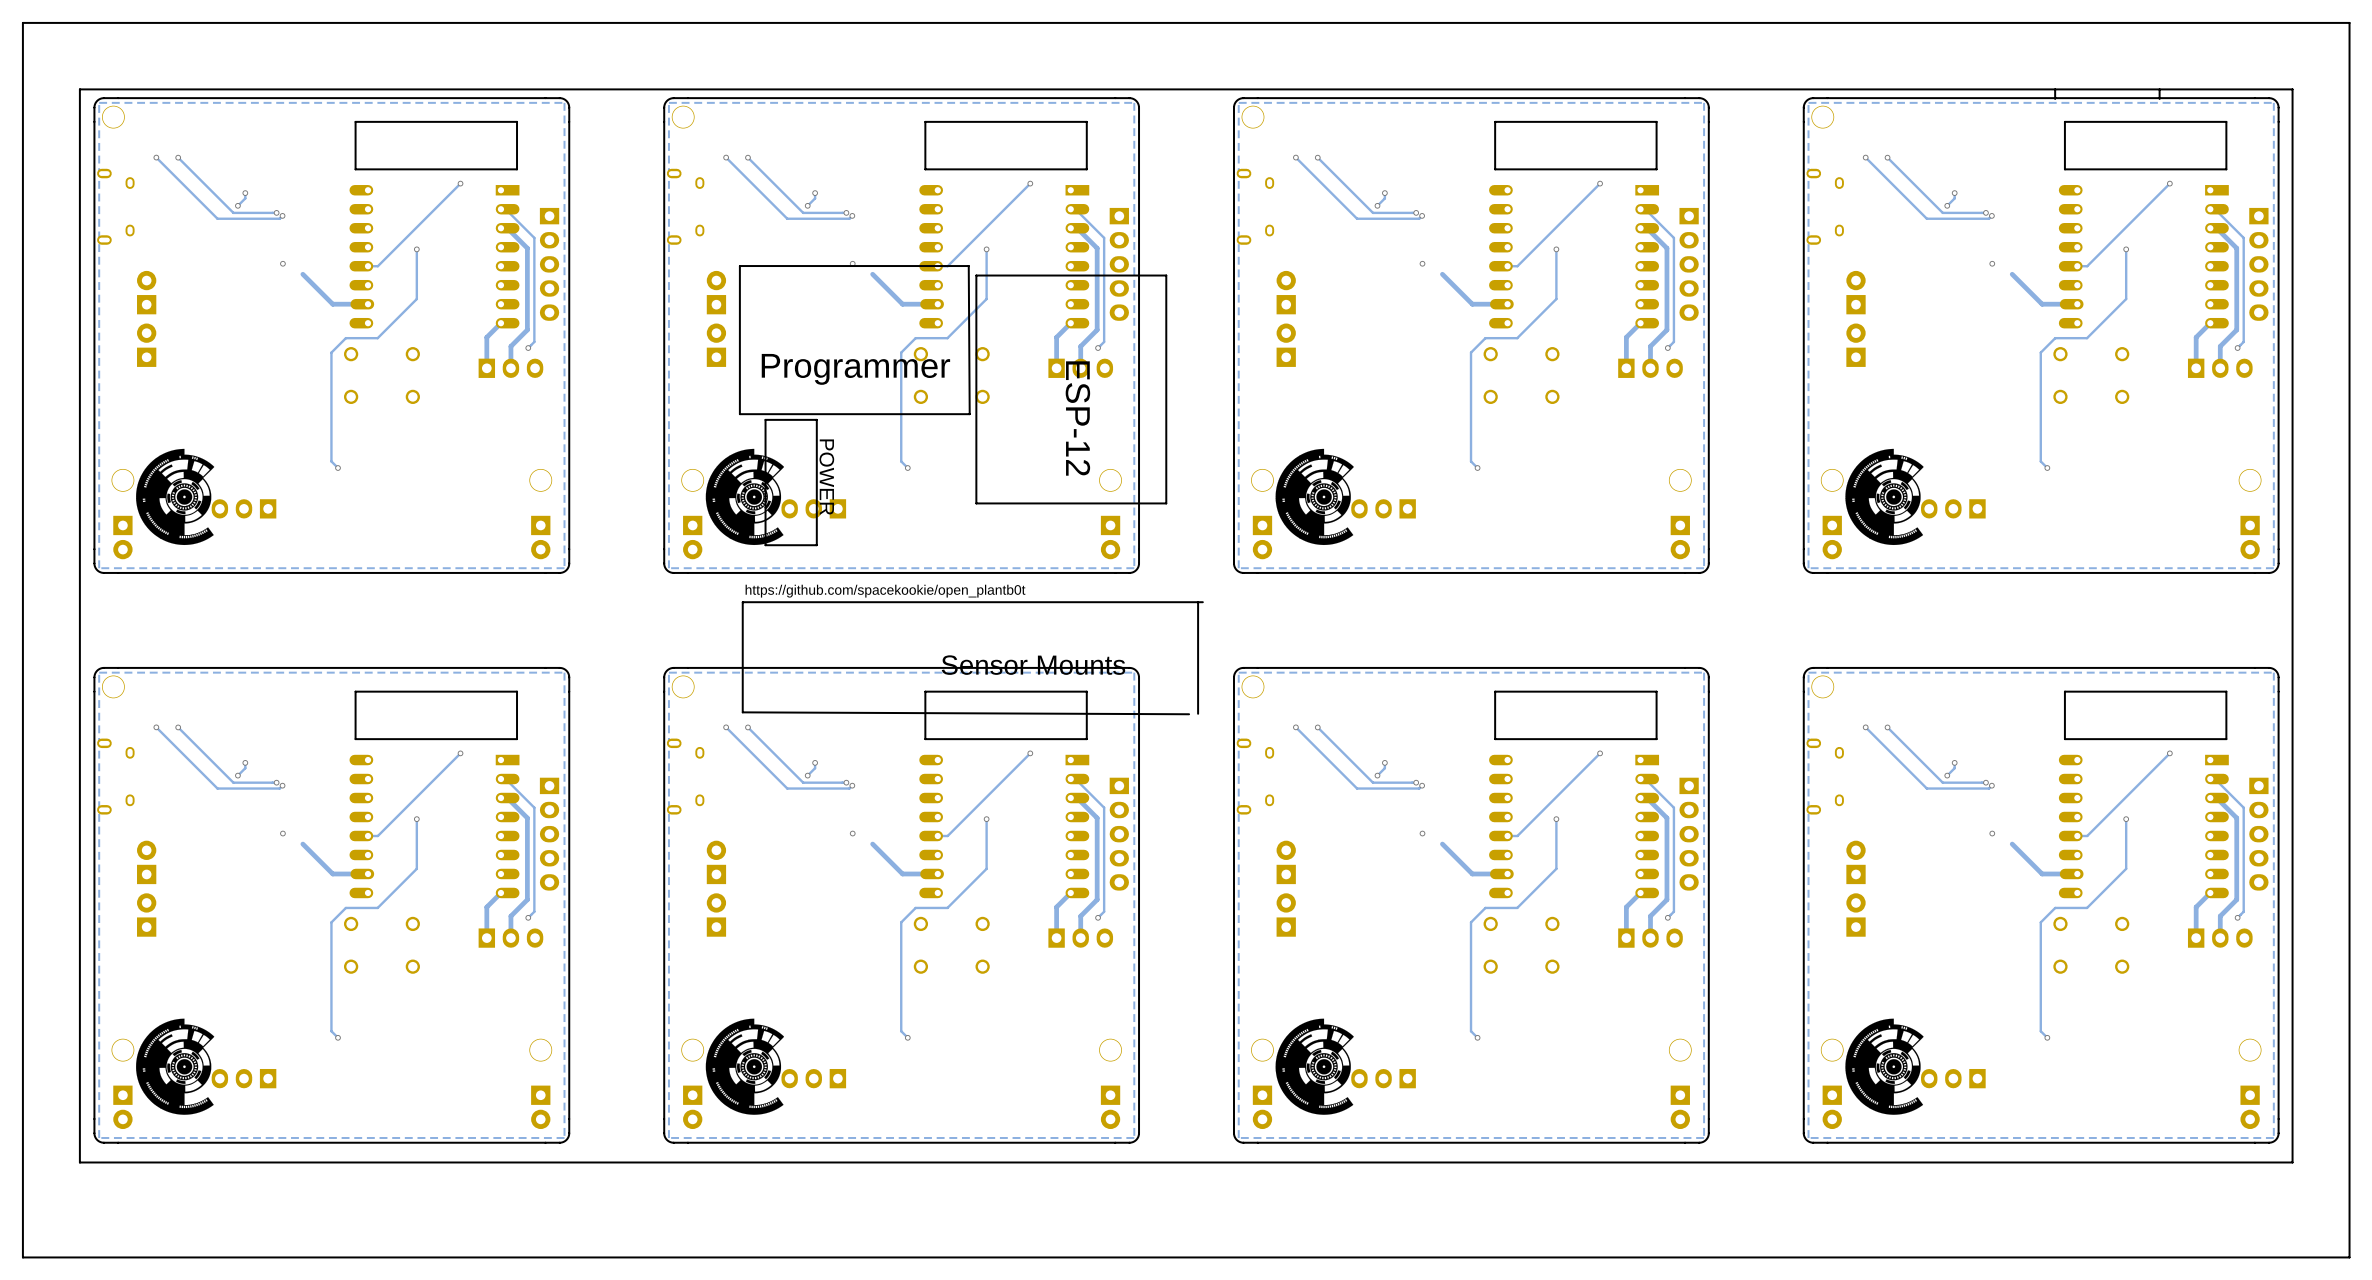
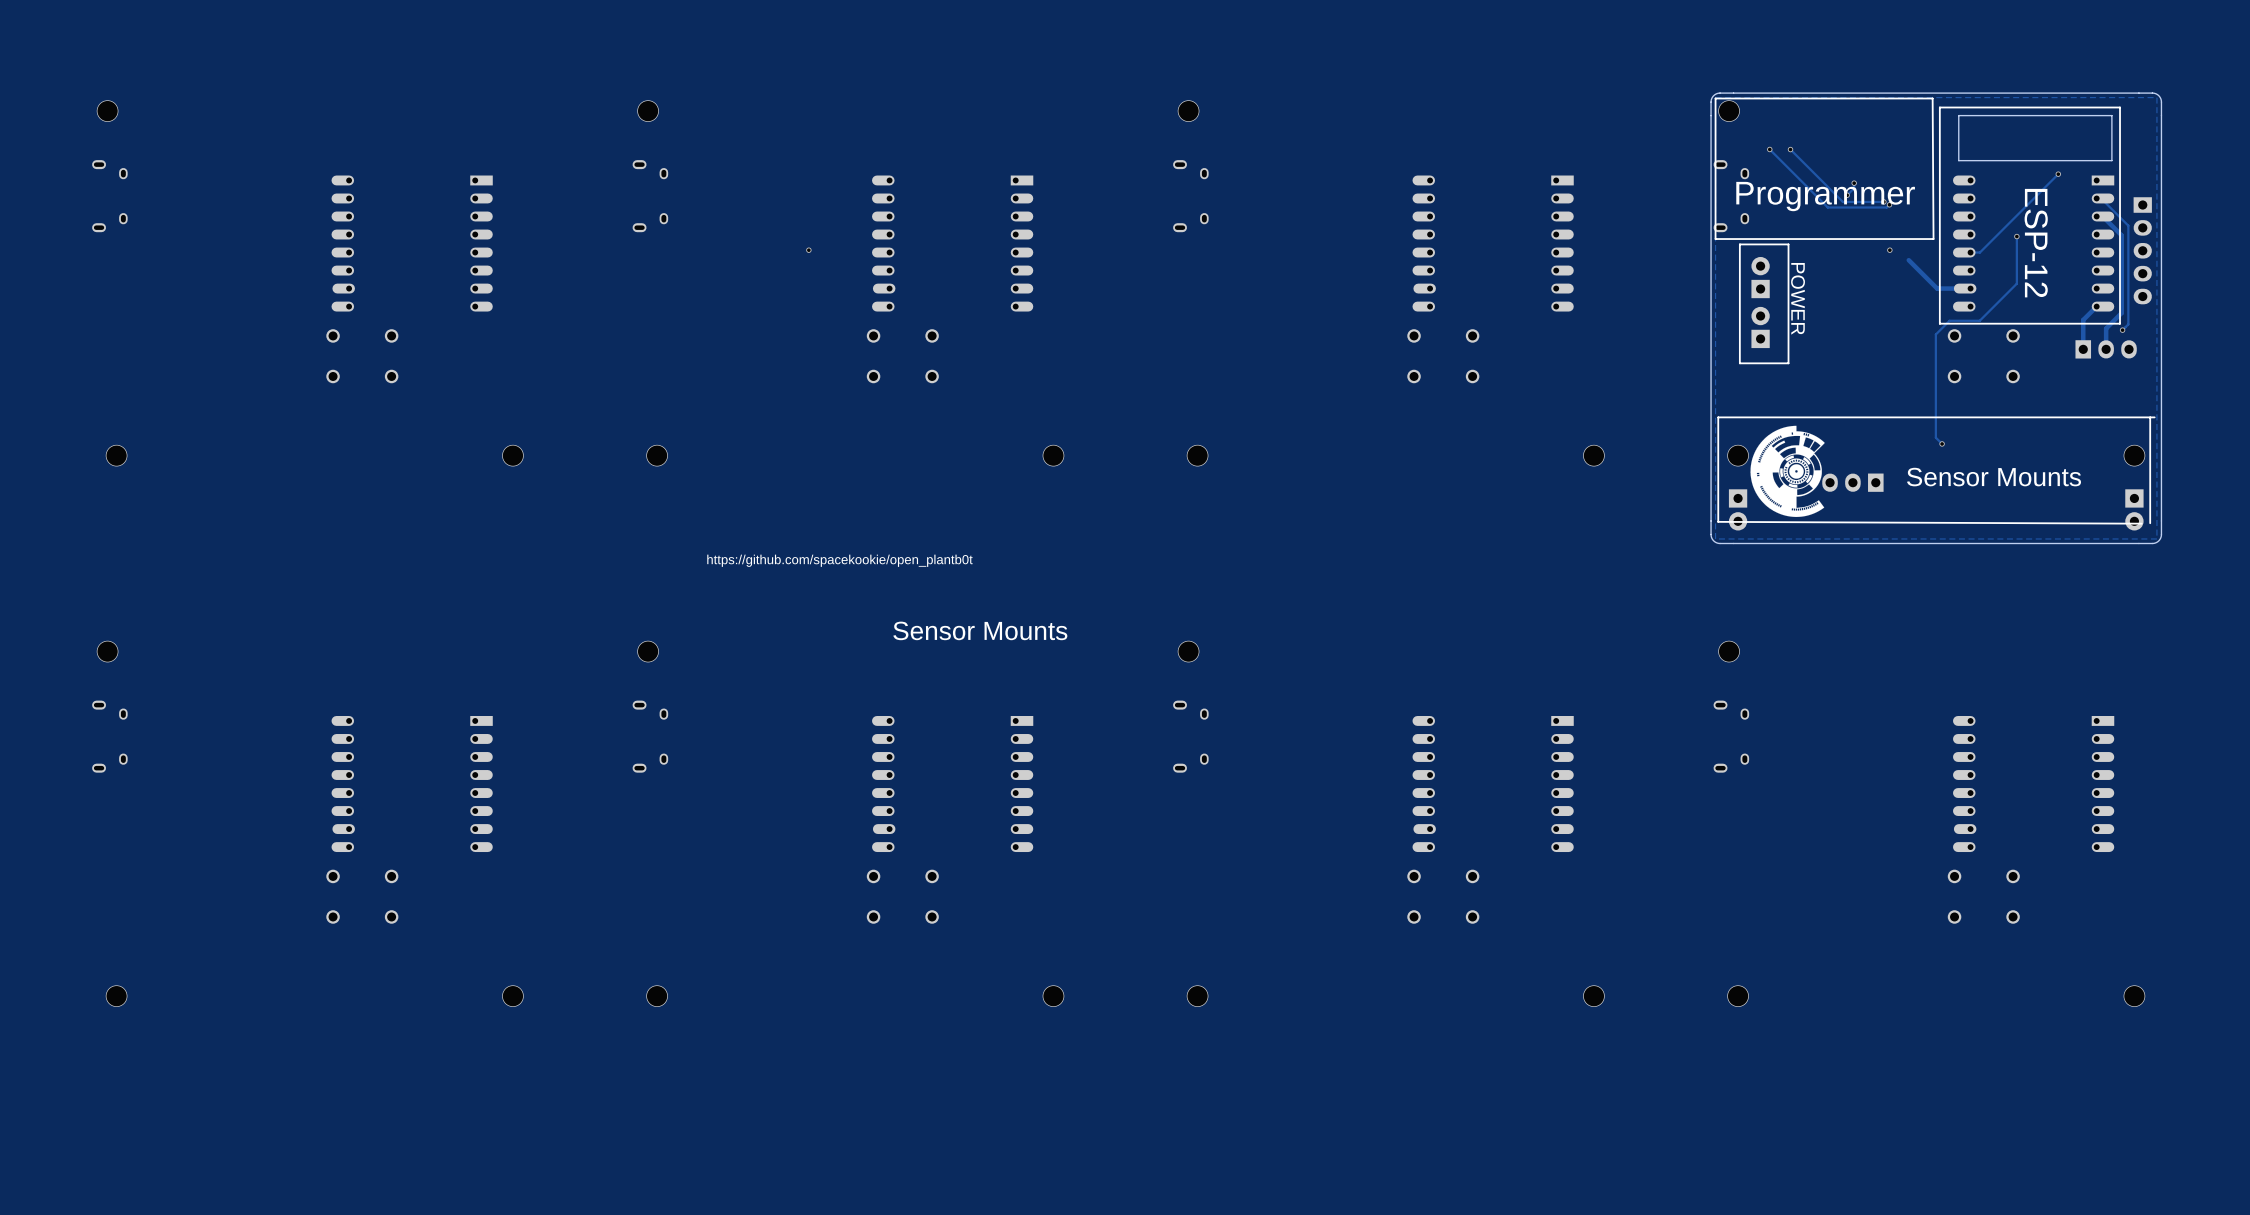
board edge: (2349, 22) (2349, 1257) (22, 1257) (22, 22) (2349, 22) -> none
board edge: (2055, 89) (2055, 98) -> none
board edge: (2159, 89) (2159, 98) -> none
board edge: (2292, 89) (79, 89) (79, 1162) (2292, 1162) (2292, 89) -> none
board edge: (559, 98) (103, 98) (97, 100) (94, 107) (94, 563) (97, 570) (103, 572) (559, 572) (566, 570) (569, 563) (569, 107) (566, 100) (559, 98) -> none
board edge: (1129, 98) (673, 98) (666, 100) (664, 107) (664, 563) (666, 570) (673, 572) (1129, 572) (1136, 570) (1139, 563) (1139, 107) (1136, 100) (1129, 98) -> none
board edge: (1699, 98) (1243, 98) (1236, 100) (1233, 107) (1233, 563) (1236, 570) (1243, 572) (1699, 572) (1706, 570) (1708, 563) (1708, 107) (1706, 100) (1699, 98) -> none
zone outline: (564, 102) (99, 102) (99, 568) (564, 568) (564, 102) -> none
zone outline: (1134, 102) (668, 102) (668, 568) (1134, 568) (1134, 102) -> none
zone outline: (1704, 102) (1238, 102) (1238, 568) (1704, 568) (1704, 102) -> none
line: none -> (1932, 98) (1715, 98) (1715, 239) (1933, 239) (1932, 98)
line: none -> (2120, 107) (2120, 323) (1939, 323) (1939, 107) (2120, 107)
board edge: (517, 121) (517, 169) (355, 169) (355, 121) (517, 121) -> none
board edge: (1086, 121) (1086, 169) (925, 169) (925, 121) (1086, 121) -> none
board edge: (1656, 121) (1656, 169) (1495, 169) (1495, 121) (1656, 121) -> none
track: (156, 157) (217, 218) (279, 218) (282, 215) -> none
via: (156, 157) -> none
track: (178, 157) (233, 212) (276, 212) -> none
via: (178, 157) -> none
track: (726, 157) (787, 218) (849, 218) (852, 215) -> none
via: (726, 157) -> none
track: (747, 157) (803, 212) (846, 212) -> none
via: (747, 157) -> none
track: (1295, 157) (1357, 218) (1419, 218) (1422, 215) -> none
via: (1295, 157) -> none
track: (1317, 157) (1372, 212) (1416, 212) -> none
via: (1317, 157) -> none
track: (460, 183) (377, 266) (368, 266) -> none
via: (460, 183) -> none
track: (1030, 183) (947, 266) (937, 266) -> none
via: (1030, 183) -> none
track: (1600, 183) (1517, 266) (1507, 266) -> none
via: (1600, 183) -> none
track: (245, 193) (245, 198) (237, 205) -> none
via: (245, 193) -> none
track: (815, 193) (815, 198) (807, 205) -> none
via: (815, 193) -> none
track: (1384, 193) (1384, 198) (1377, 205) -> none
via: (1384, 193) -> none
via: (237, 205) -> none
via: (807, 205) -> none
via: (1377, 205) -> none
text: none -> Programmer (1825, 196)
track: (505, 209) (534, 237) (534, 341) (528, 348) -> none
track: (1075, 209) (1104, 237) (1104, 341) (1098, 348) -> none
track: (1645, 209) (1673, 237) (1673, 341) (1667, 348) -> none
via: (276, 212) -> none
via: (846, 212) -> none
via: (1416, 212) -> none
via: (282, 215) -> none
via: (852, 215) -> none
via: (1422, 215) -> none
track: (500, 228) (507, 228) (527, 248) (527, 329) (510, 346) (510, 368) -> none
track: (1070, 228) (1077, 228) (1097, 248) (1097, 329) (1080, 346) (1080, 368) -> none
track: (1640, 228) (1646, 228) (1666, 248) (1666, 329) (1650, 346) (1650, 368) -> none
track: (416, 249) (416, 299) (377, 338) (345, 338) (331, 352) (331, 461) (338, 468) -> none
via: (416, 249) -> none
track: (986, 249) (986, 299) (947, 338) (915, 338) (901, 352) (901, 461) (907, 468) -> none
via: (986, 249) -> none
track: (1556, 249) (1556, 299) (1517, 338) (1485, 338) (1471, 352) (1471, 461) (1477, 468) -> none
via: (1556, 249) -> none
text: none -> ESP-12 (2036, 243)
line: none -> (1788, 244) (1739, 244) (1739, 363) (1788, 363) (1788, 244)
via: (282, 263) -> none
via: (1422, 263) -> none
part: (549, 264) -> none
part: (1119, 264) -> none
part: (1689, 264) -> none
line: (968, 266) (739, 266) (739, 414) (969, 414) (968, 266) -> none
track: (302, 274) (332, 304) (368, 304) -> none
track: (872, 274) (902, 304) (937, 304) -> none
track: (1442, 274) (1472, 304) (1507, 304) -> none
line: (1166, 275) (1166, 503) (976, 503) (976, 275) (1166, 275) -> none
part: (146, 292) -> none
part: (716, 292) -> none
part: (1286, 292) -> none
text: none -> POWER (1798, 298)
track: (500, 323) (486, 337) (486, 368) -> none
track: (1070, 323) (1056, 337) (1056, 368) -> none
track: (1640, 323) (1626, 337) (1626, 368) -> none
part: (146, 345) -> none
part: (716, 345) -> none
part: (1286, 345) -> none
via: (528, 348) -> none
via: (1098, 348) -> none
via: (1667, 348) -> none
part: (510, 368) -> none
part: (1080, 368) -> none
part: (1650, 368) -> none
text: Programmer (855, 369) -> none
text: ESP-12 (1077, 418) -> none
line: (816, 419) (765, 419) (765, 545) (816, 545) (816, 419) -> none
line: none -> (2150, 417) (2150, 523)
line: none -> (2154, 417) (1718, 417) (1718, 521) (2141, 523)
drawing: [136, 448, 215, 546] -> none
drawing: [705, 448, 785, 546] -> none
drawing: [1275, 448, 1354, 546] -> none
via: (338, 468) -> none
via: (907, 468) -> none
via: (1477, 468) -> none
text: POWER (826, 477) -> none
text: none -> Sensor Mounts (1994, 477)
part: (243, 508) -> none
part: (813, 508) -> none
part: (1383, 508) -> none
part: (122, 537) -> none
part: (540, 537) -> none
part: (692, 537) -> none
part: (1110, 537) -> none
part: (1262, 537) -> none
part: (1680, 537) -> none
line: (1198, 602) (1198, 713) -> none
line: (1202, 602) (742, 602) (742, 712) (1189, 714) -> none
board edge: (559, 667) (103, 667) (97, 670) (94, 677) (94, 1133) (97, 1139) (103, 1142) (559, 1142) (566, 1139) (569, 1133) (569, 677) (566, 670) (559, 667) -> none
board edge: (1129, 667) (673, 667) (666, 670) (664, 677) (664, 1133) (666, 1139) (673, 1142) (1129, 1142) (1136, 1139) (1139, 1133) (1139, 677) (1136, 670) (1129, 667) -> none
board edge: (1699, 667) (1243, 667) (1236, 670) (1233, 677) (1233, 1133) (1236, 1139) (1243, 1142) (1699, 1142) (1706, 1139) (1708, 1133) (1708, 677) (1706, 670) (1699, 667) -> none
board edge: (2269, 667) (1813, 667) (1806, 670) (1803, 677) (1803, 1133) (1806, 1139) (1813, 1142) (2269, 1142) (2275, 1139) (2278, 1133) (2278, 677) (2275, 670) (2269, 667) -> none
zone outline: (564, 672) (564, 1137) (99, 1137) (99, 672) (564, 672) -> none
zone outline: (1134, 672) (1134, 1137) (668, 1137) (668, 672) (1134, 672) -> none
zone outline: (1704, 672) (1704, 1137) (1238, 1137) (1238, 672) (1704, 672) -> none
zone outline: (2273, 672) (2273, 1137) (1808, 1137) (1808, 672) (2273, 672) -> none
board edge: (517, 691) (517, 739) (355, 739) (355, 691) (517, 691) -> none
board edge: (1086, 691) (1086, 739) (925, 739) (925, 691) (1086, 691) -> none
board edge: (1656, 691) (1656, 739) (1495, 739) (1495, 691) (1656, 691) -> none
board edge: (2226, 691) (2226, 739) (2064, 739) (2064, 691) (2226, 691) -> none
track: (156, 727) (217, 788) (279, 788) (282, 785) -> none
via: (156, 727) -> none
track: (178, 727) (233, 782) (276, 782) -> none
via: (178, 727) -> none
track: (726, 727) (787, 788) (849, 788) (852, 785) -> none
via: (726, 727) -> none
track: (747, 727) (803, 782) (846, 782) -> none
via: (747, 727) -> none
track: (1295, 727) (1357, 788) (1419, 788) (1422, 785) -> none
via: (1295, 727) -> none
track: (1317, 727) (1372, 782) (1416, 782) -> none
via: (1317, 727) -> none
track: (1865, 727) (1926, 788) (1989, 788) (1991, 785) -> none
via: (1865, 727) -> none
track: (1887, 727) (1942, 782) (1985, 782) -> none
via: (1887, 727) -> none
track: (460, 753) (377, 836) (368, 836) -> none
via: (460, 753) -> none
track: (1030, 753) (947, 836) (937, 836) -> none
via: (1030, 753) -> none
track: (1600, 753) (1517, 836) (1507, 836) -> none
via: (1600, 753) -> none
track: (2169, 753) (2087, 836) (2077, 836) -> none
via: (2169, 753) -> none
track: (245, 762) (245, 768) (237, 775) -> none
via: (245, 762) -> none
track: (815, 762) (815, 768) (807, 775) -> none
via: (815, 762) -> none
track: (1384, 762) (1384, 768) (1377, 775) -> none
via: (1384, 762) -> none
track: (1954, 762) (1954, 768) (1947, 775) -> none
via: (1954, 762) -> none
via: (237, 775) -> none
via: (807, 775) -> none
via: (1377, 775) -> none
via: (1947, 775) -> none
track: (505, 779) (534, 807) (534, 911) (528, 917) -> none
track: (1075, 779) (1104, 807) (1104, 911) (1098, 917) -> none
track: (1645, 779) (1673, 807) (1673, 911) (1667, 917) -> none
track: (2215, 779) (2243, 807) (2243, 911) (2237, 917) -> none
via: (276, 782) -> none
via: (846, 782) -> none
via: (1416, 782) -> none
via: (1985, 782) -> none
via: (282, 785) -> none
via: (852, 785) -> none
via: (1422, 785) -> none
via: (1991, 785) -> none
track: (500, 798) (507, 798) (527, 818) (527, 899) (510, 916) (510, 938) -> none
track: (1070, 798) (1077, 798) (1097, 818) (1097, 899) (1080, 916) (1080, 938) -> none
track: (1640, 798) (1646, 798) (1666, 818) (1666, 899) (1650, 916) (1650, 938) -> none
track: (2210, 798) (2216, 798) (2236, 818) (2236, 899) (2220, 916) (2220, 938) -> none
track: (416, 819) (416, 868) (377, 907) (345, 907) (331, 922) (331, 1031) (338, 1037) -> none
via: (416, 819) -> none
track: (986, 819) (986, 868) (947, 907) (915, 907) (901, 922) (901, 1031) (907, 1037) -> none
via: (986, 819) -> none
track: (1556, 819) (1556, 868) (1517, 907) (1485, 907) (1471, 922) (1471, 1031) (1477, 1037) -> none
via: (1556, 819) -> none
track: (2126, 819) (2126, 868) (2087, 907) (2055, 907) (2040, 922) (2040, 1031) (2047, 1037) -> none
via: (2126, 819) -> none
via: (282, 833) -> none
via: (852, 833) -> none
via: (1422, 833) -> none
via: (1992, 833) -> none
part: (549, 834) -> none
part: (1119, 834) -> none
part: (1689, 834) -> none
part: (2258, 834) -> none
track: (302, 844) (332, 873) (368, 873) -> none
track: (872, 844) (902, 873) (937, 873) -> none
track: (1442, 844) (1472, 873) (1507, 873) -> none
track: (2012, 844) (2042, 873) (2077, 873) -> none
part: (146, 862) -> none
part: (716, 862) -> none
part: (1286, 862) -> none
part: (1856, 862) -> none
track: (500, 892) (486, 907) (486, 938) -> none
track: (1070, 892) (1056, 907) (1056, 938) -> none
track: (1640, 892) (1626, 907) (1626, 938) -> none
track: (2210, 892) (2196, 907) (2196, 938) -> none
part: (146, 915) -> none
part: (716, 915) -> none
part: (1286, 915) -> none
part: (1856, 915) -> none
via: (528, 917) -> none
via: (1098, 917) -> none
via: (1667, 917) -> none
via: (2237, 917) -> none
part: (510, 938) -> none
part: (1080, 938) -> none
part: (1650, 938) -> none
part: (2220, 938) -> none
drawing: [136, 1018, 215, 1115] -> none
drawing: [705, 1018, 785, 1115] -> none
drawing: [1275, 1018, 1354, 1115] -> none
drawing: [1845, 1018, 1924, 1115] -> none
via: (338, 1037) -> none
via: (907, 1037) -> none
via: (1477, 1037) -> none
via: (2047, 1037) -> none
part: (243, 1078) -> none
part: (813, 1078) -> none
part: (1383, 1078) -> none
part: (1953, 1078) -> none
part: (122, 1107) -> none
part: (540, 1107) -> none
part: (692, 1107) -> none
part: (1110, 1107) -> none
part: (1262, 1107) -> none
part: (1680, 1107) -> none
part: (1832, 1107) -> none
part: (2250, 1107) -> none

